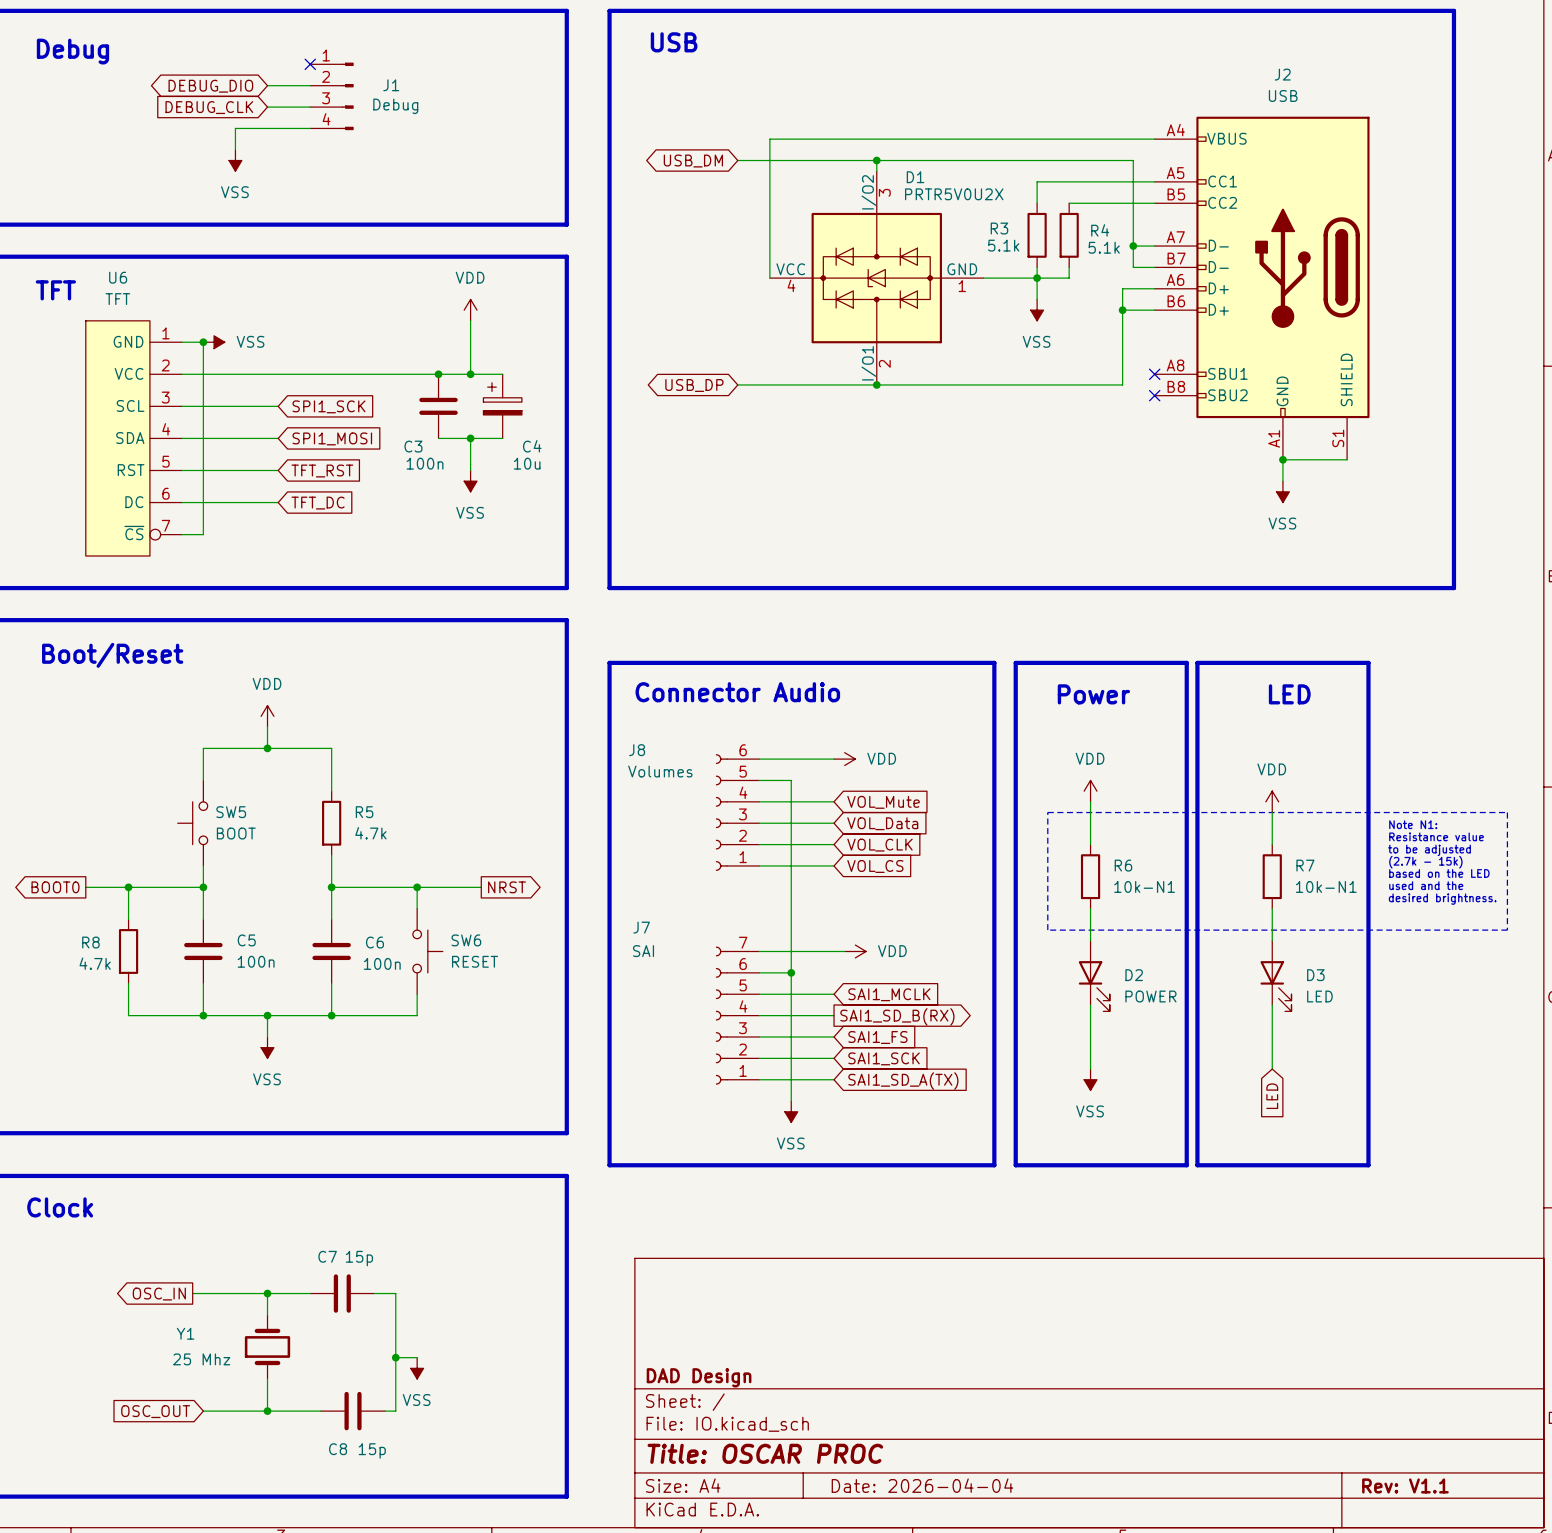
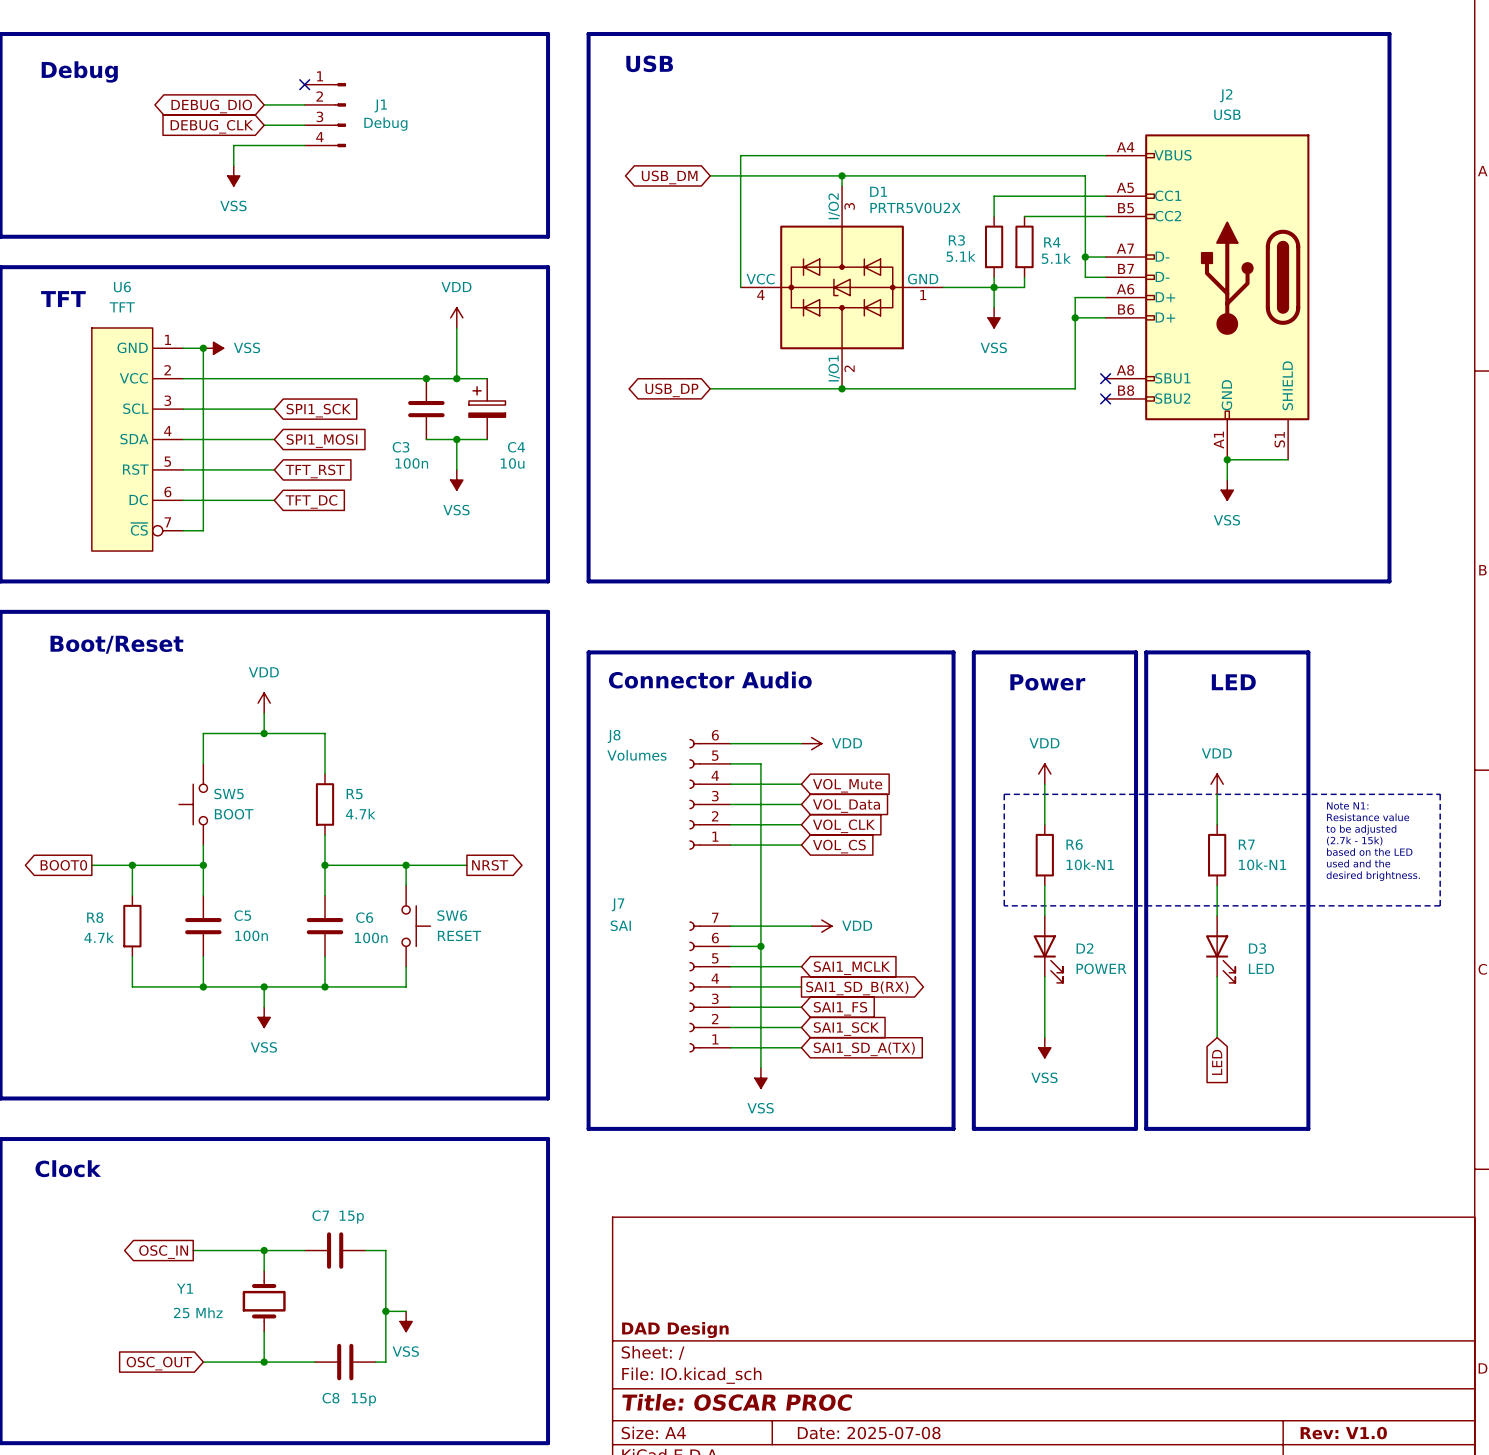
title block: Date: 2026-04-04 (922, 1485) -> Date: 2025-07-08 (869, 1433)
title block: Rev: V1.1 (1405, 1485) -> Rev: V1.0 (1343, 1433)

